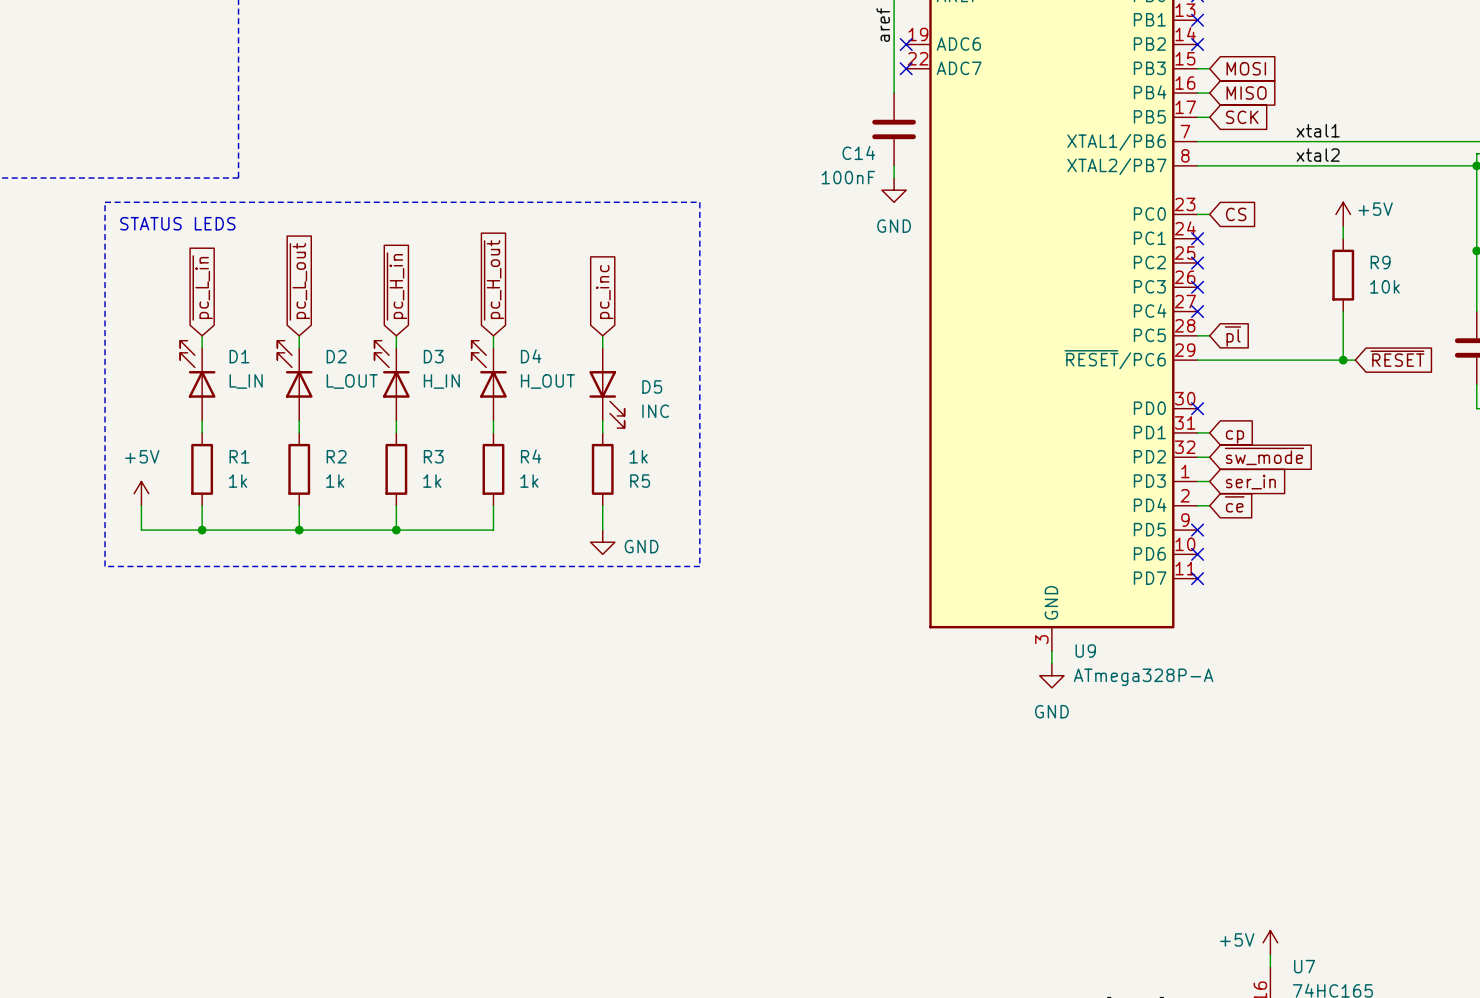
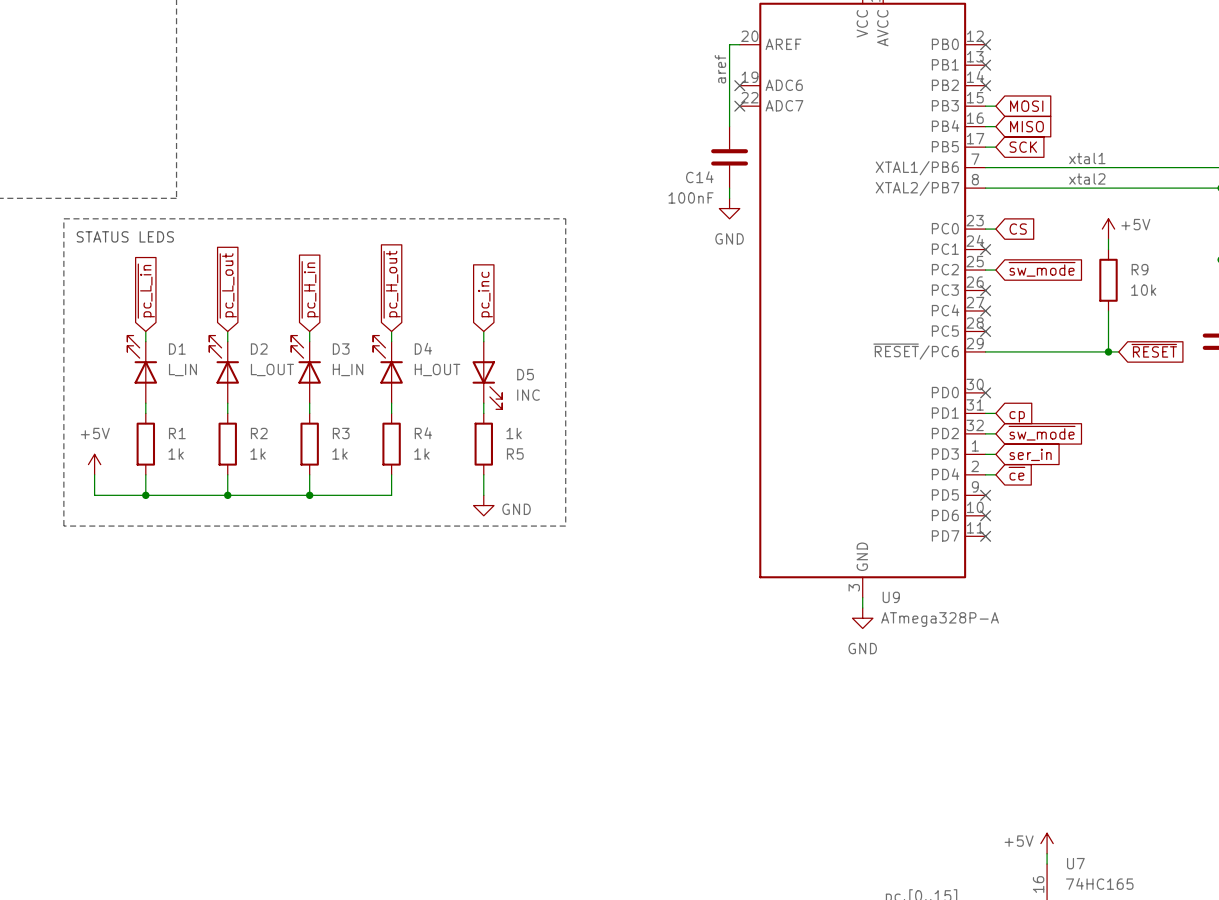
global label: none -> ~{sw_mode} (1042, 269)
no-connect mark: (1197, 263) -> none
wire: (1197, 335) (1209, 335) -> (985, 270) (995, 270)
no-connect mark: none -> (985, 331)
global label: ~{pl} (1232, 336) -> none

